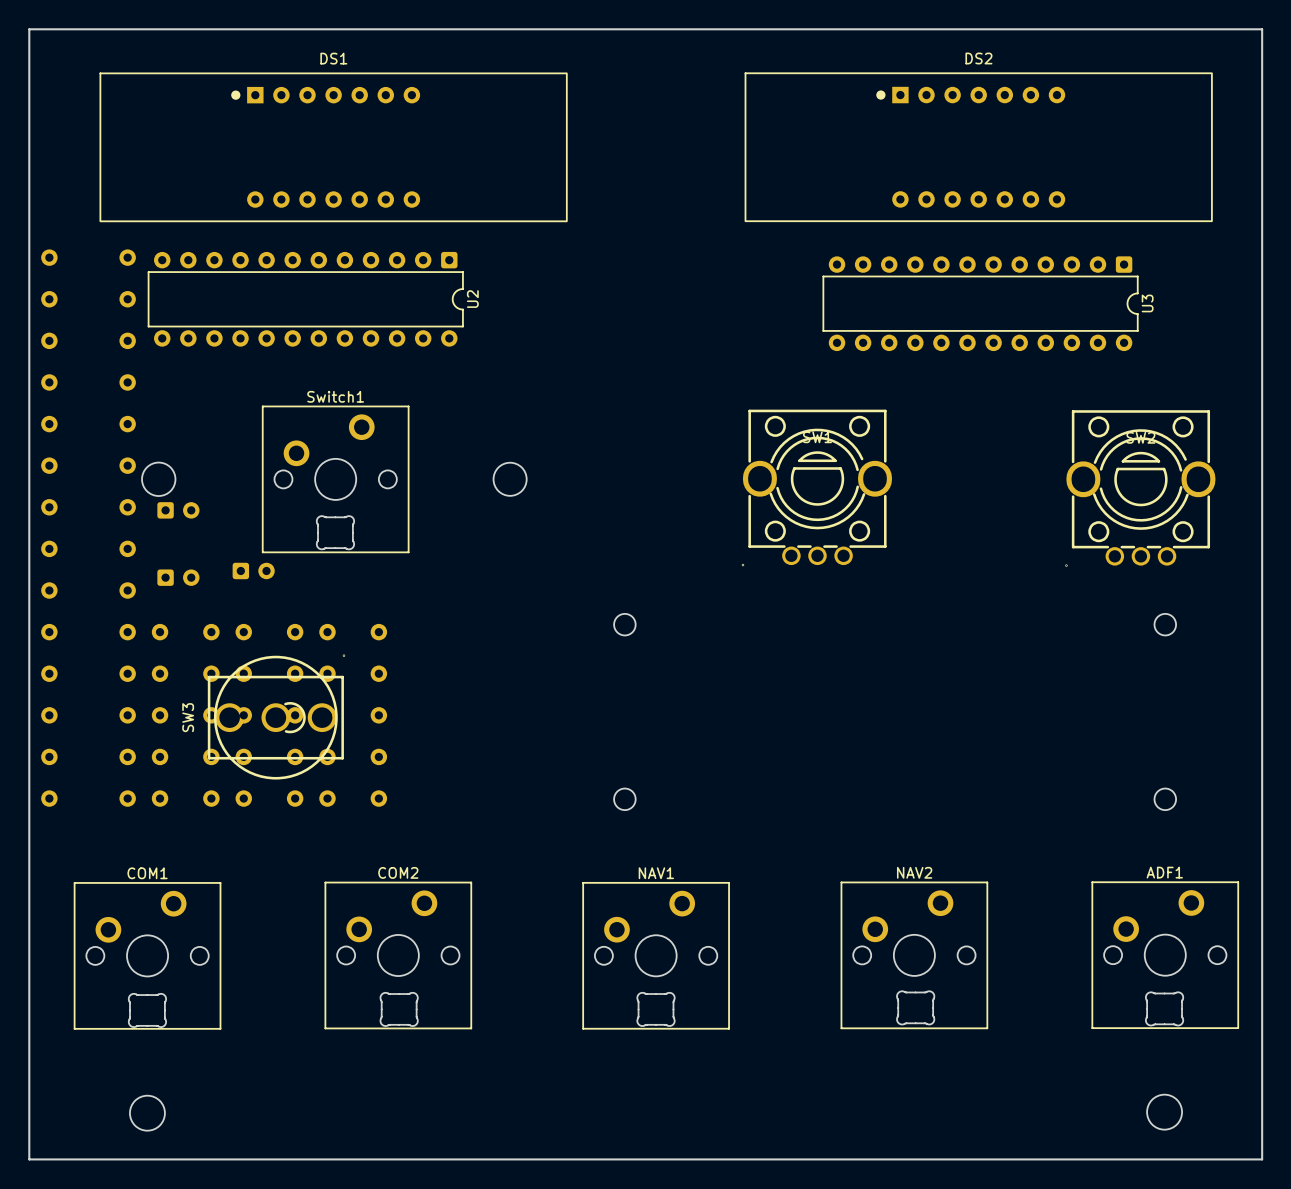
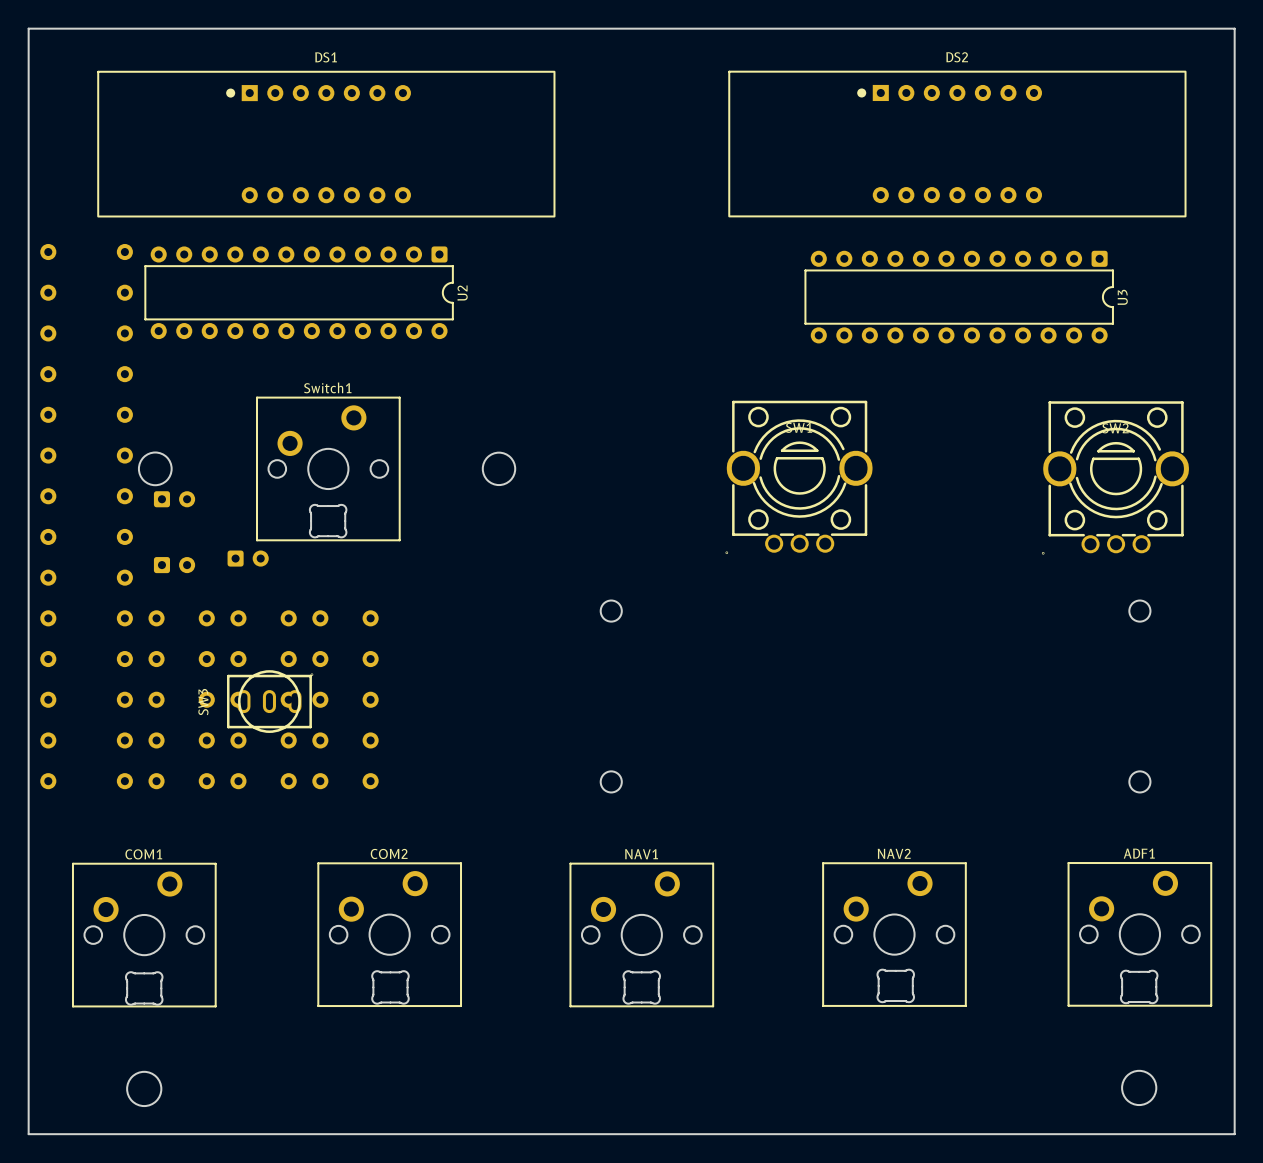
SW3 footprint: [207, 655, 345, 780] -> [226, 670, 313, 733]

